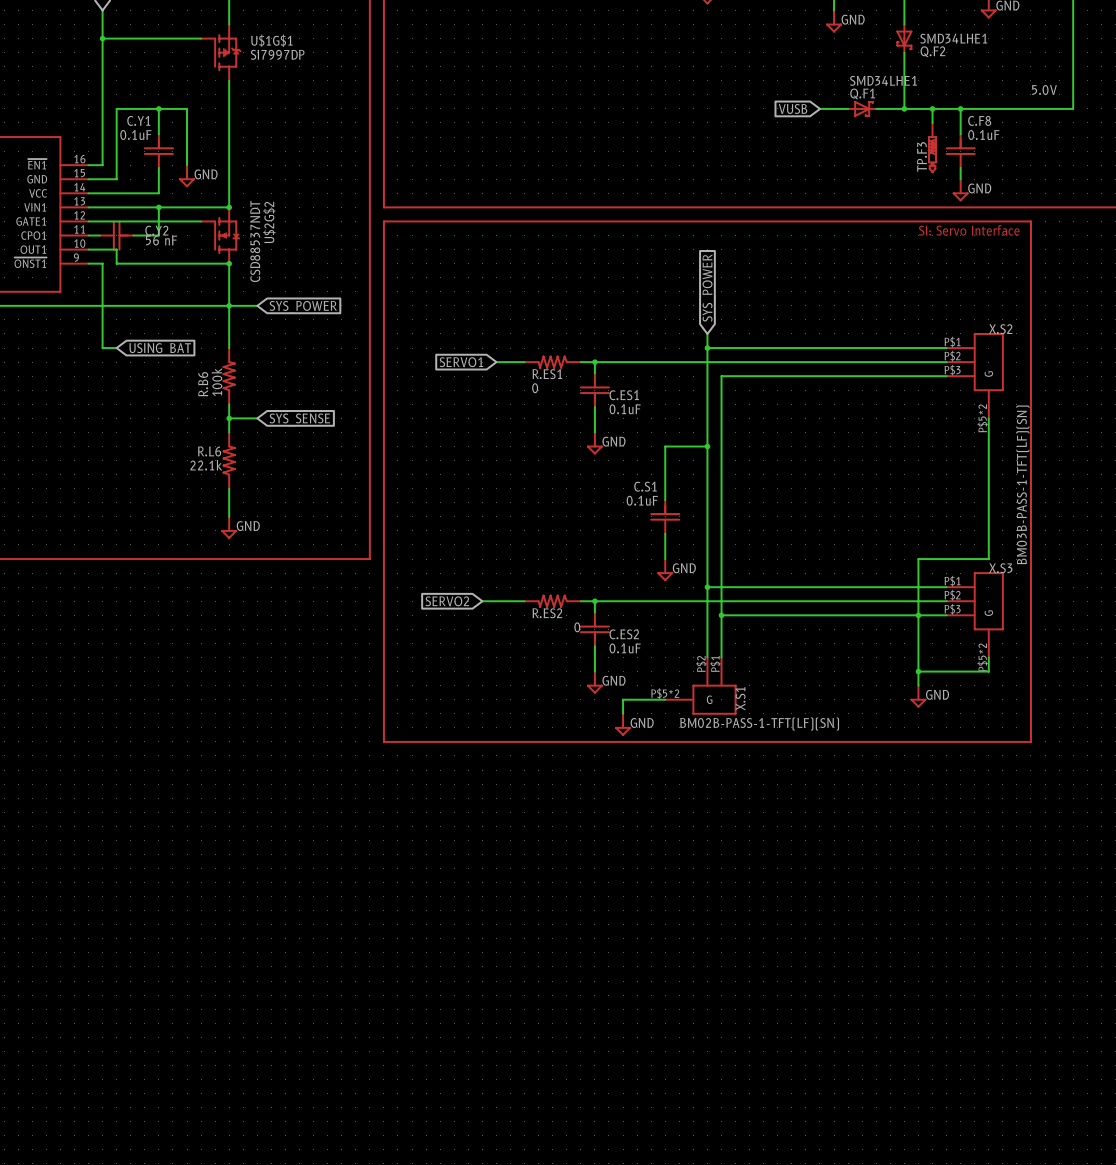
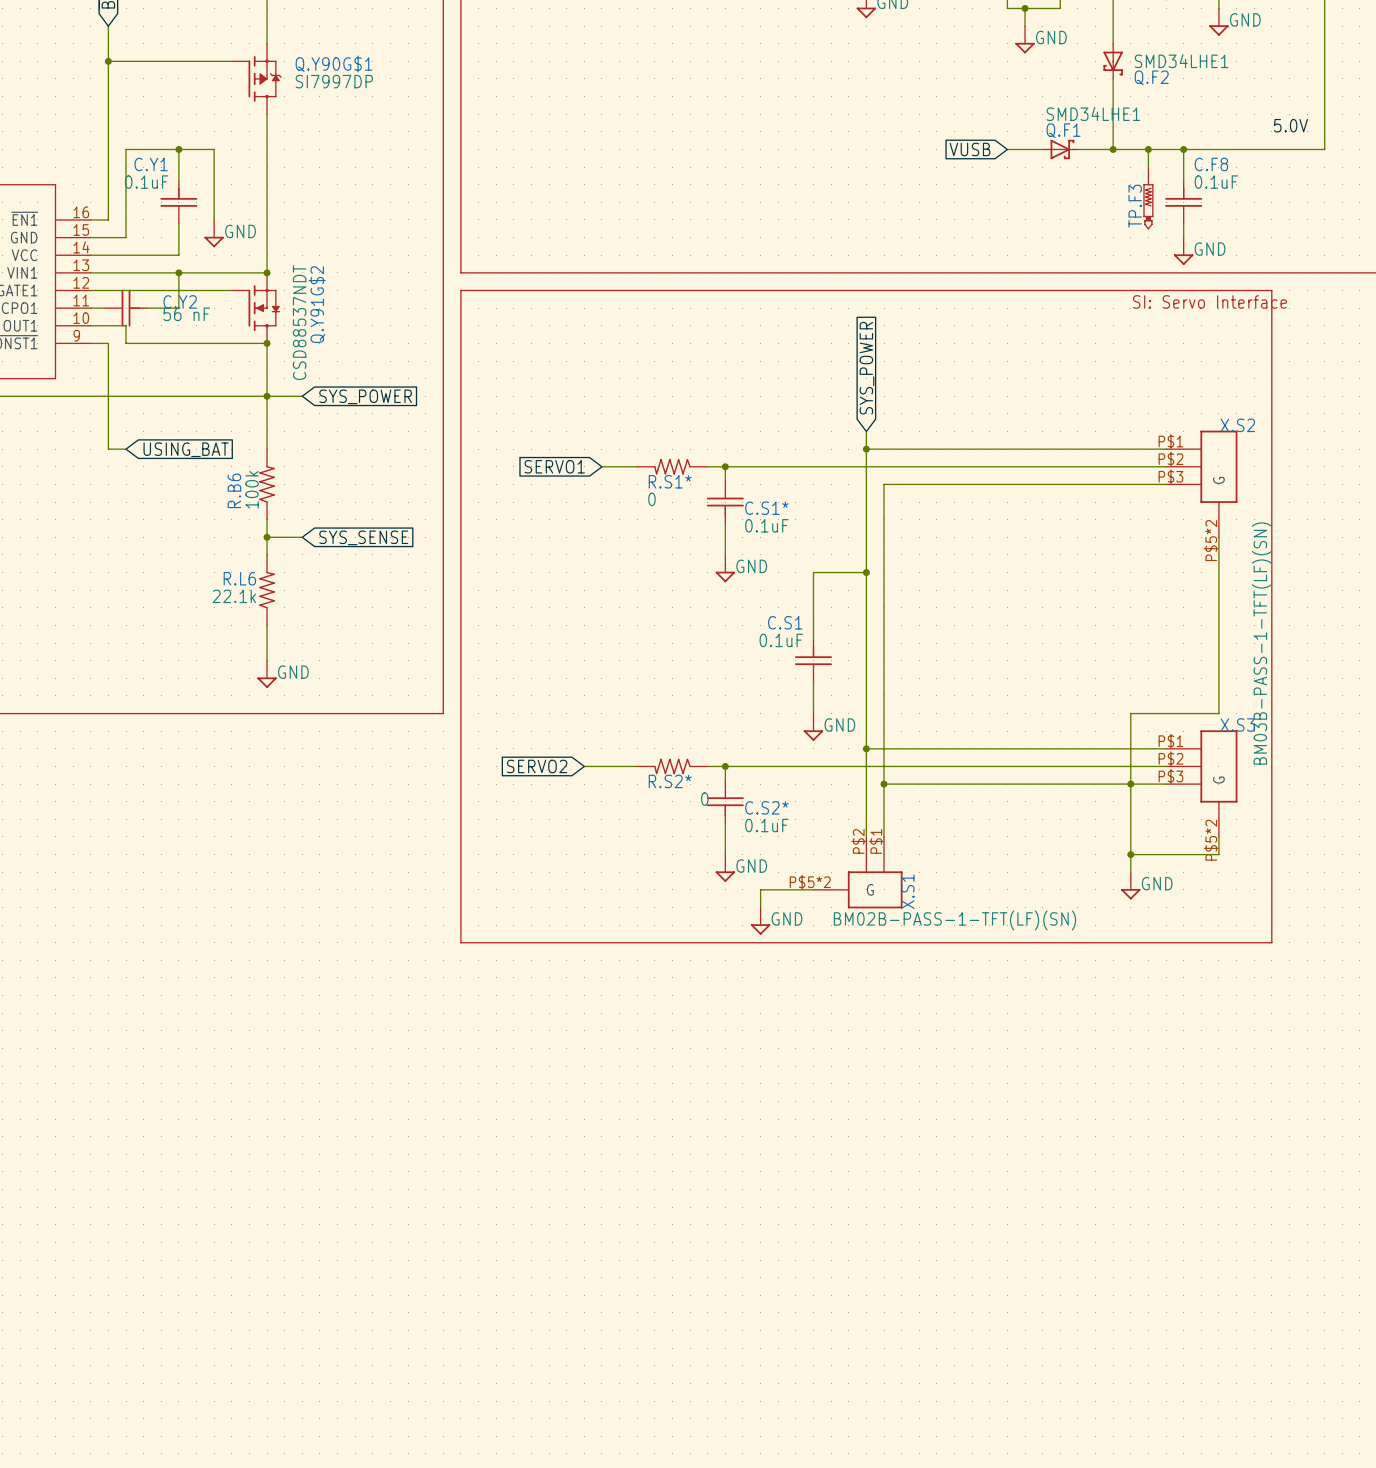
U$1G$1 name: U$1G$1 (271, 40) -> Q.Y90G$1 (334, 63)
U$2G$2 name: U$2G$2 (269, 222) -> Q.Y91G$2 (317, 304)
R.ES1 name: R.ES1 (547, 374) -> R.S1* (670, 481)
C.ES1 name: C.ES1 (624, 395) -> C.S1* (766, 508)
R.ES2 name: R.ES2 (547, 613) -> R.S2* (670, 781)
C.ES2 name: C.ES2 (624, 634) -> C.S2* (766, 807)

